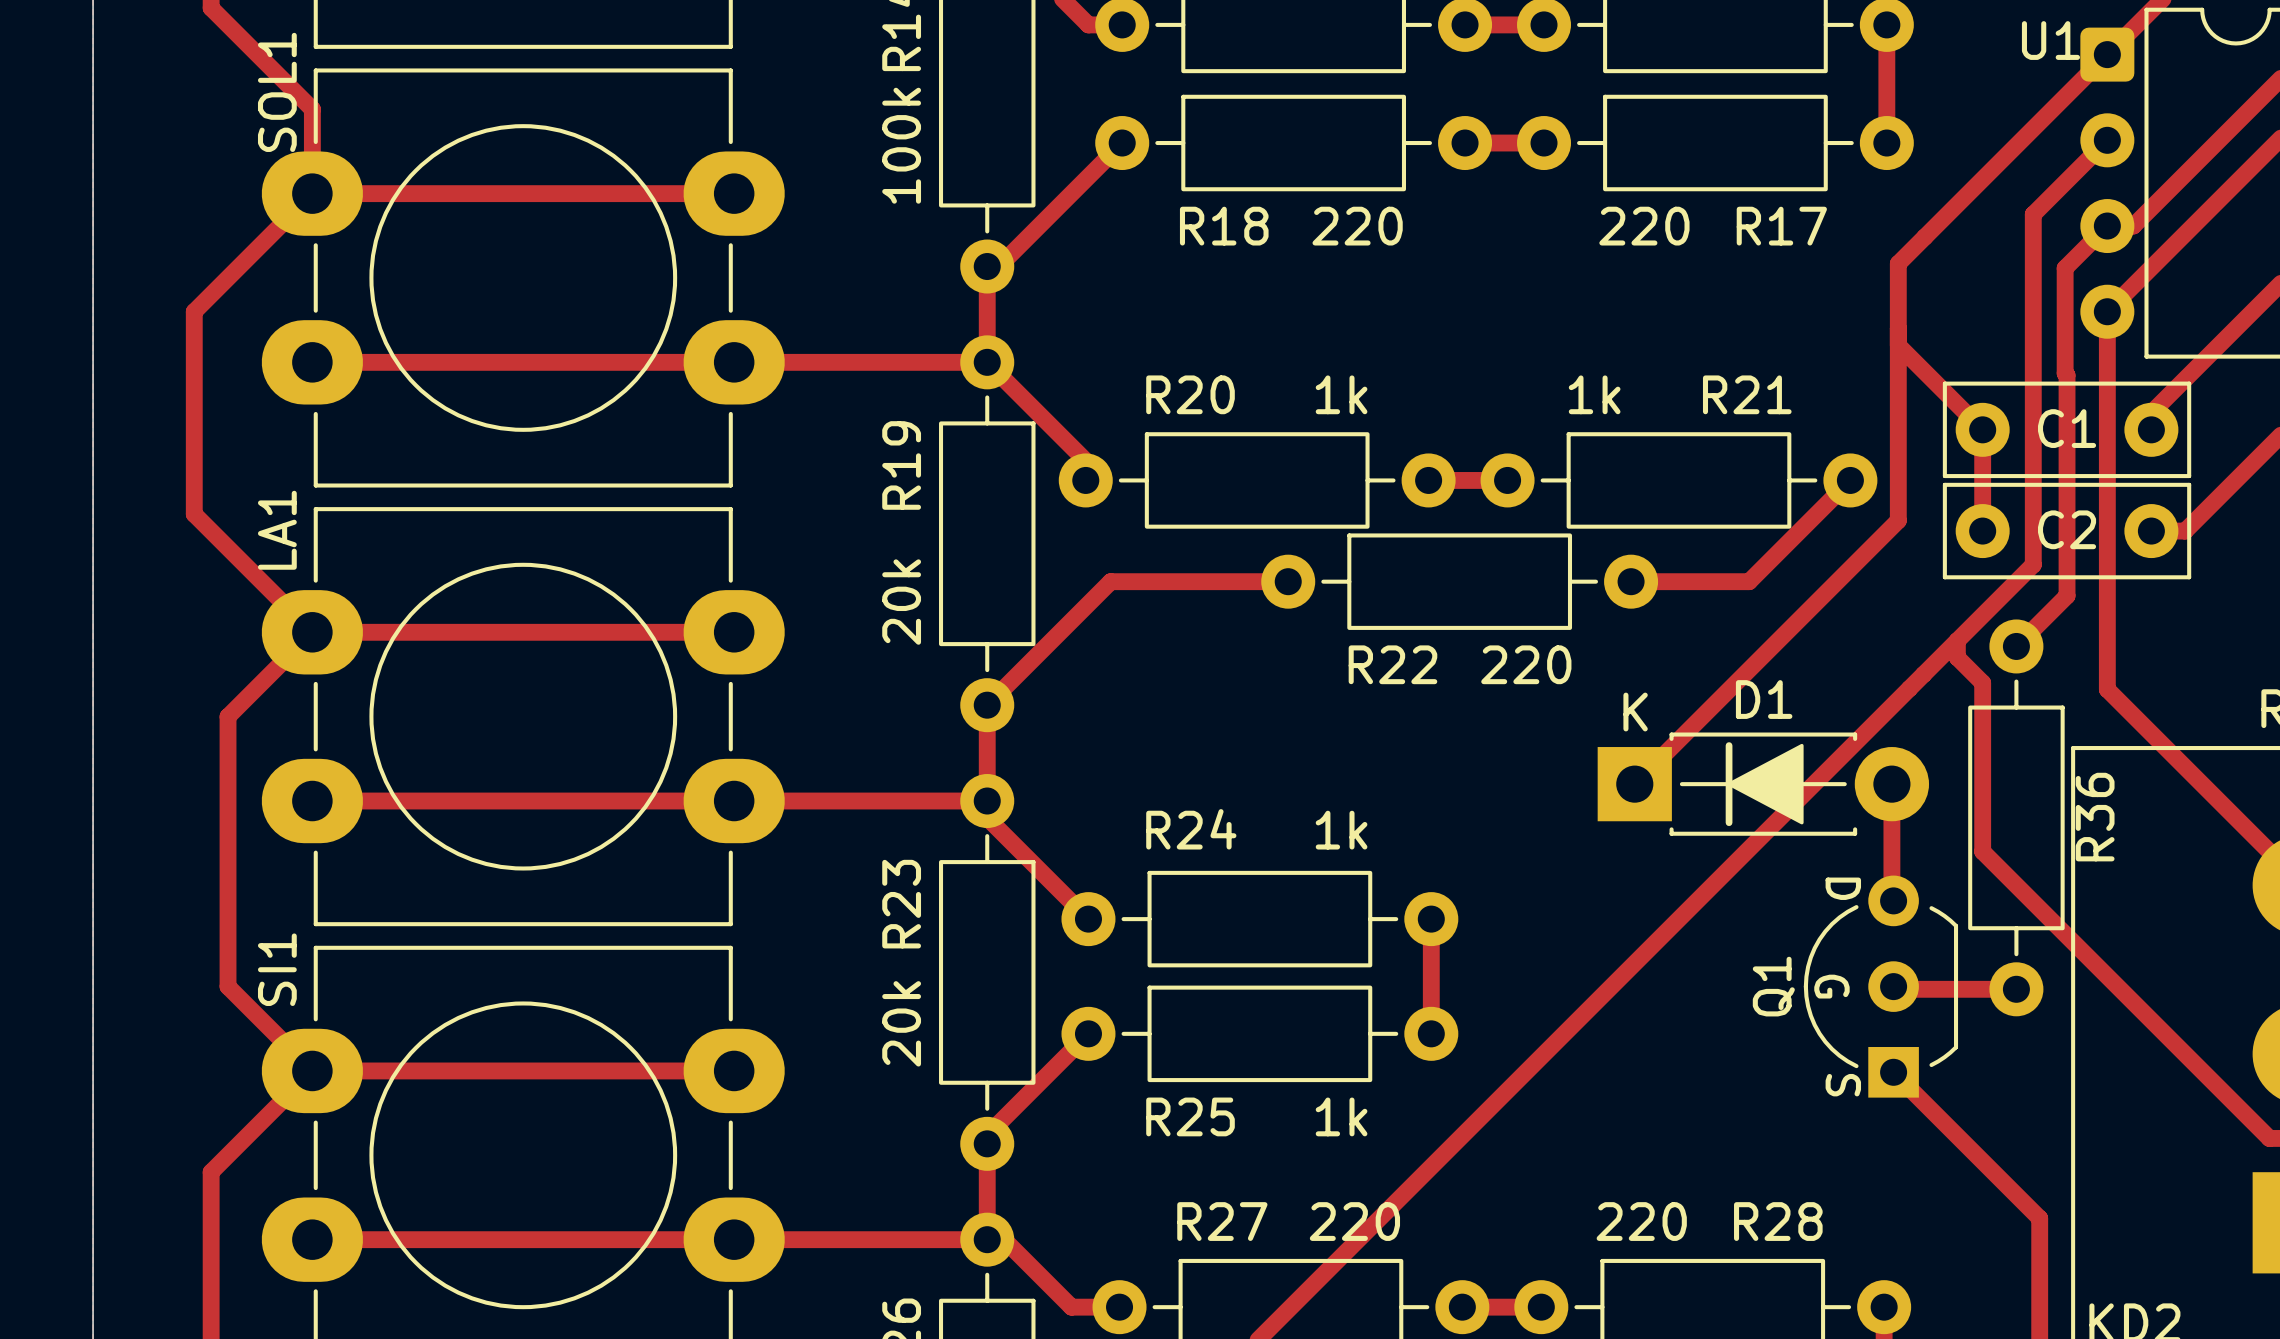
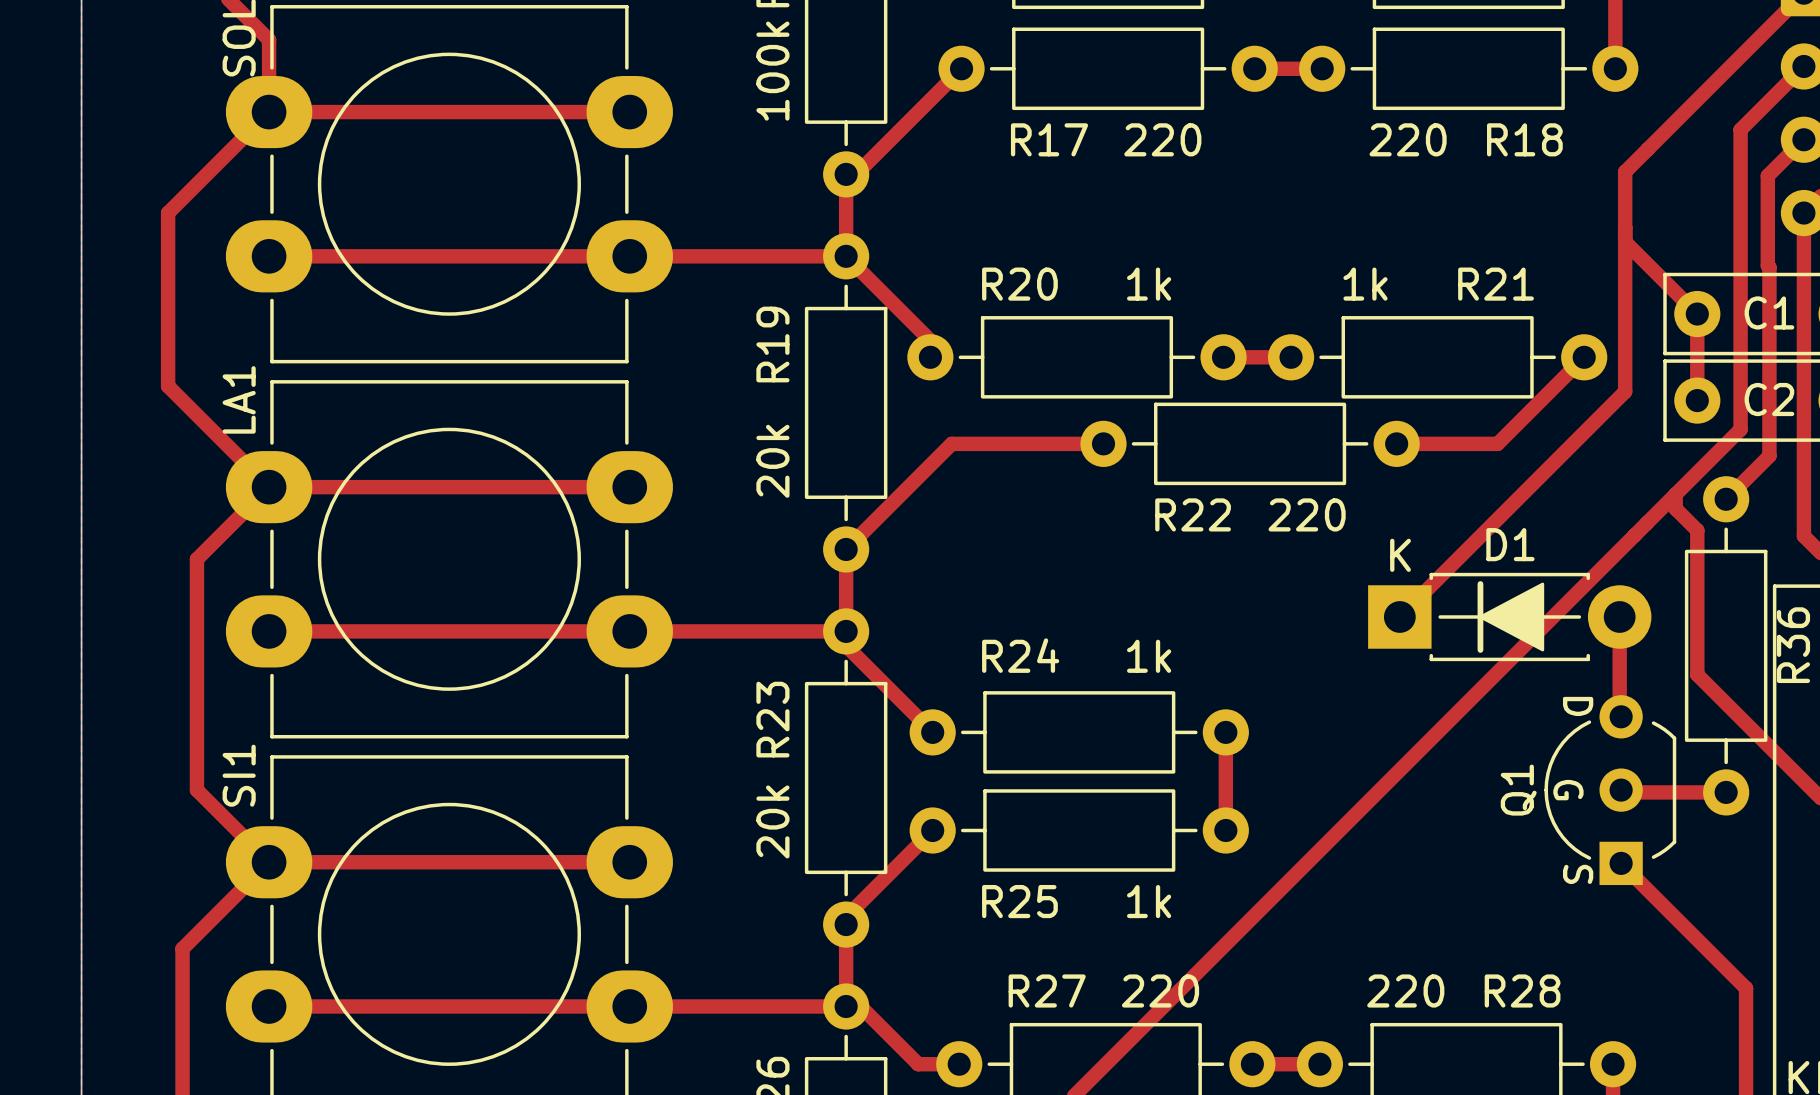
R18 name: R18 (1224, 226) -> R17 (1049, 139)
R17 name: R17 (1781, 226) -> R18 (1524, 139)

